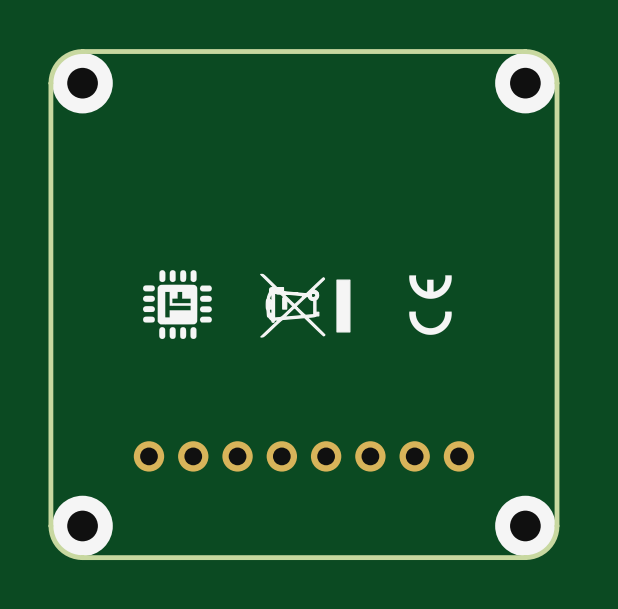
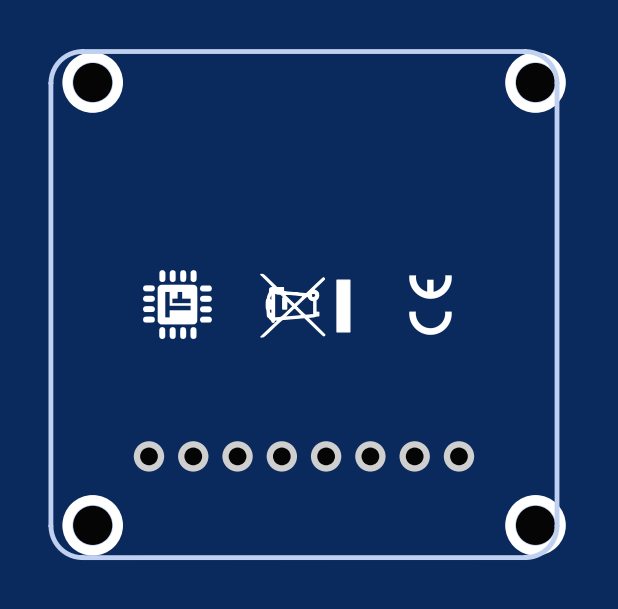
part footprint: [52, 52, 113, 114] -> [62, 52, 123, 113]
part footprint: [495, 52, 556, 114] -> [505, 52, 566, 113]
part footprint: [52, 495, 113, 557] -> [62, 495, 123, 556]
part footprint: [495, 495, 556, 557] -> [505, 495, 566, 556]

